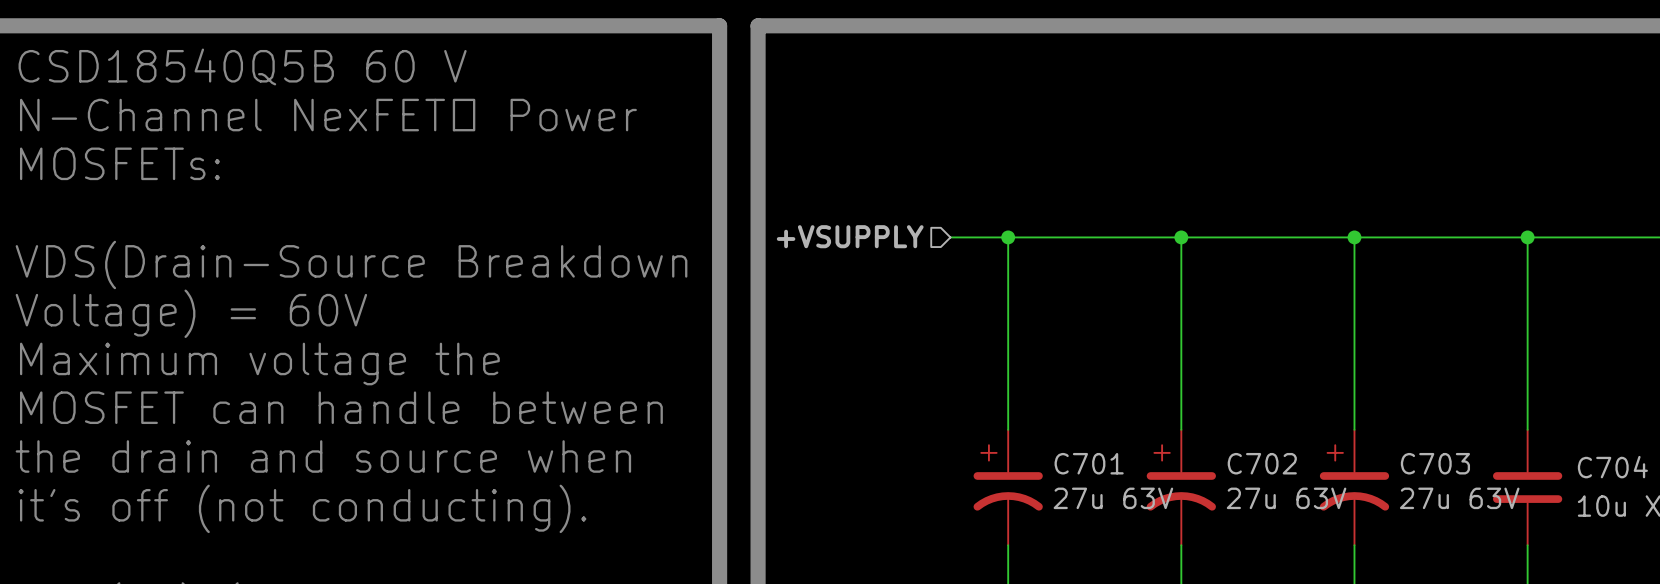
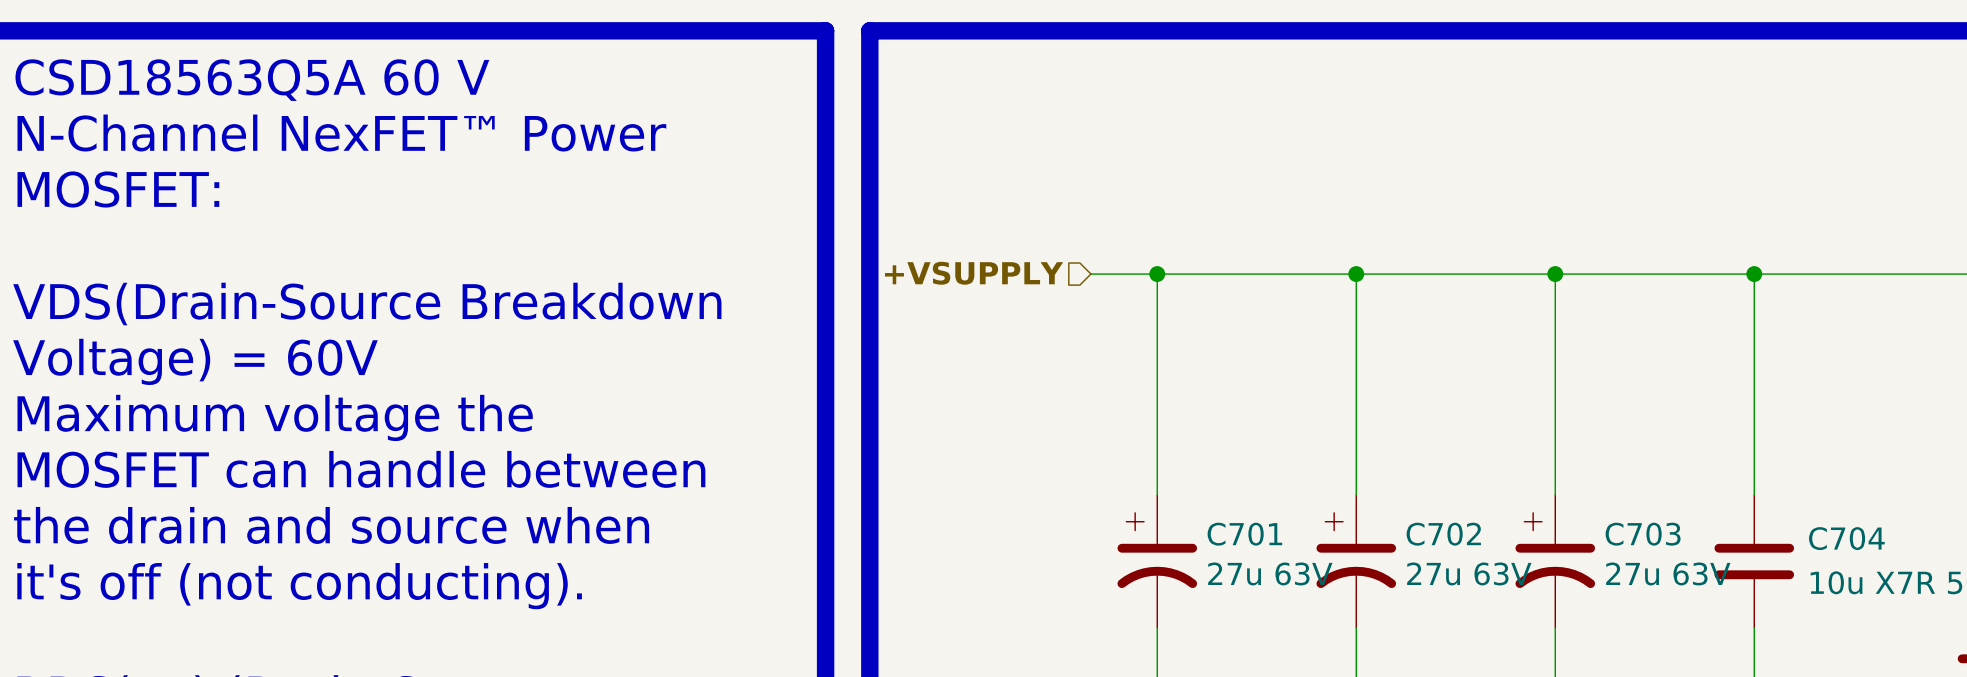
text: CSD18540Q5B 60 V (242, 66) -> CSD18563Q5A 60 V (252, 80)
text: MOSFETs: (119, 163) -> MOSFET: (118, 189)

